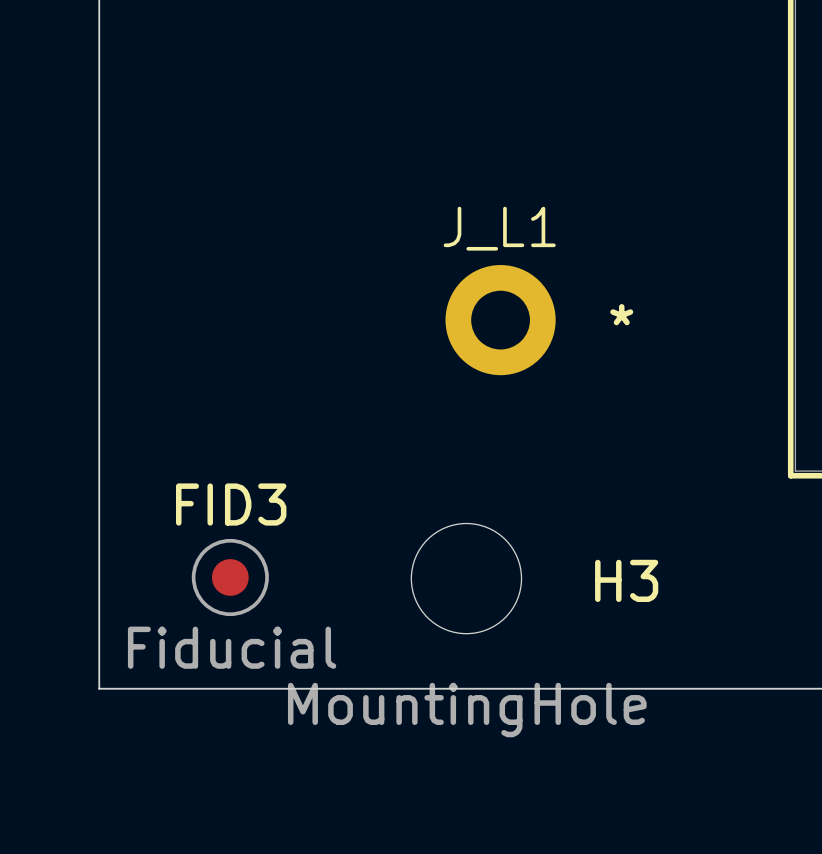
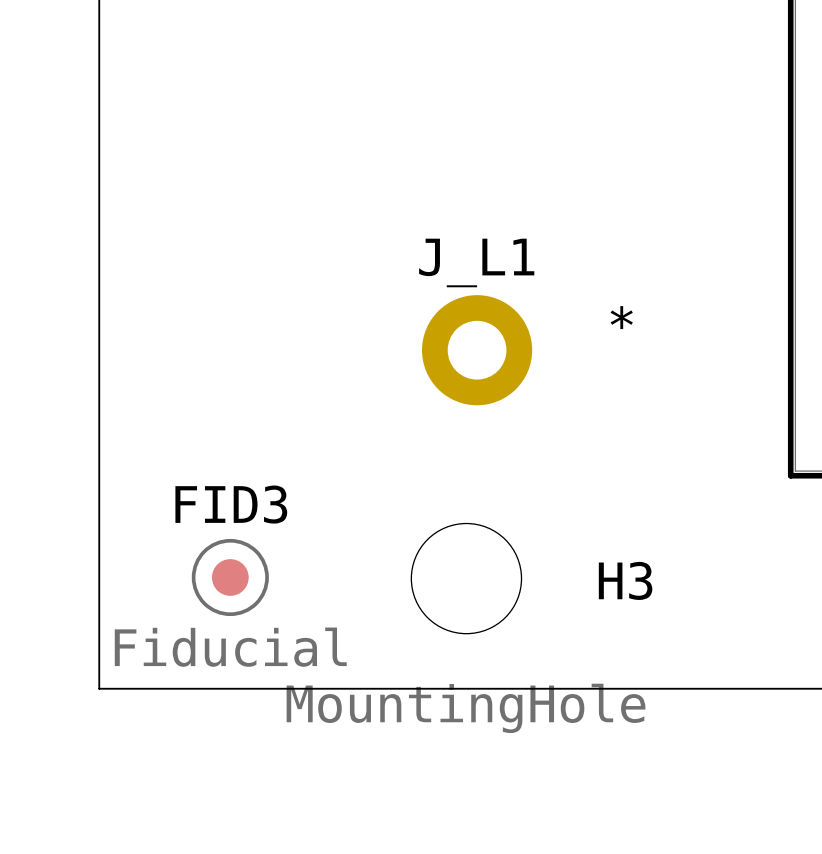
J_L1 position: (500, 320) -> (477, 350)

